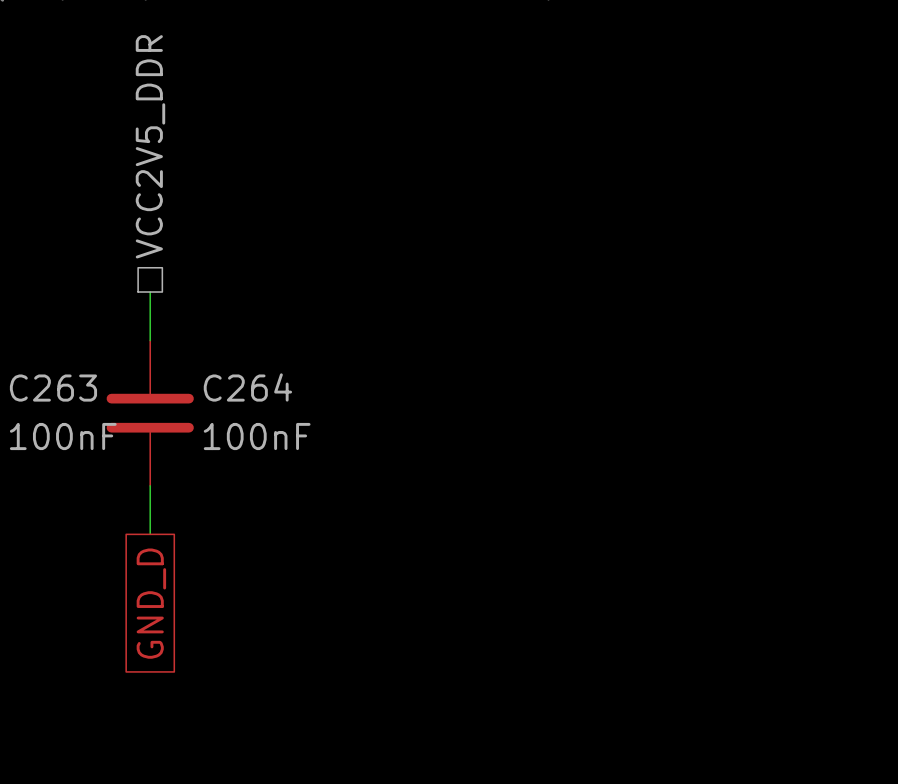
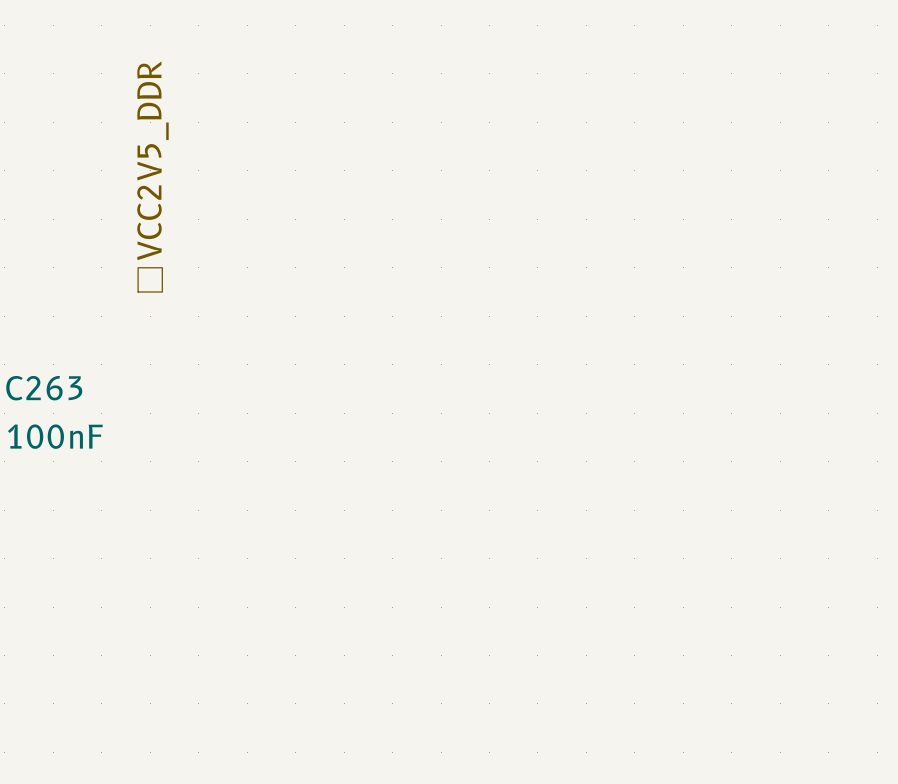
wire: (150, 292) (150, 340) -> none
C264: 100nF (150, 413) -> none
wire: (150, 485) (150, 534) -> none
global label: GND_D (151, 603) -> none

